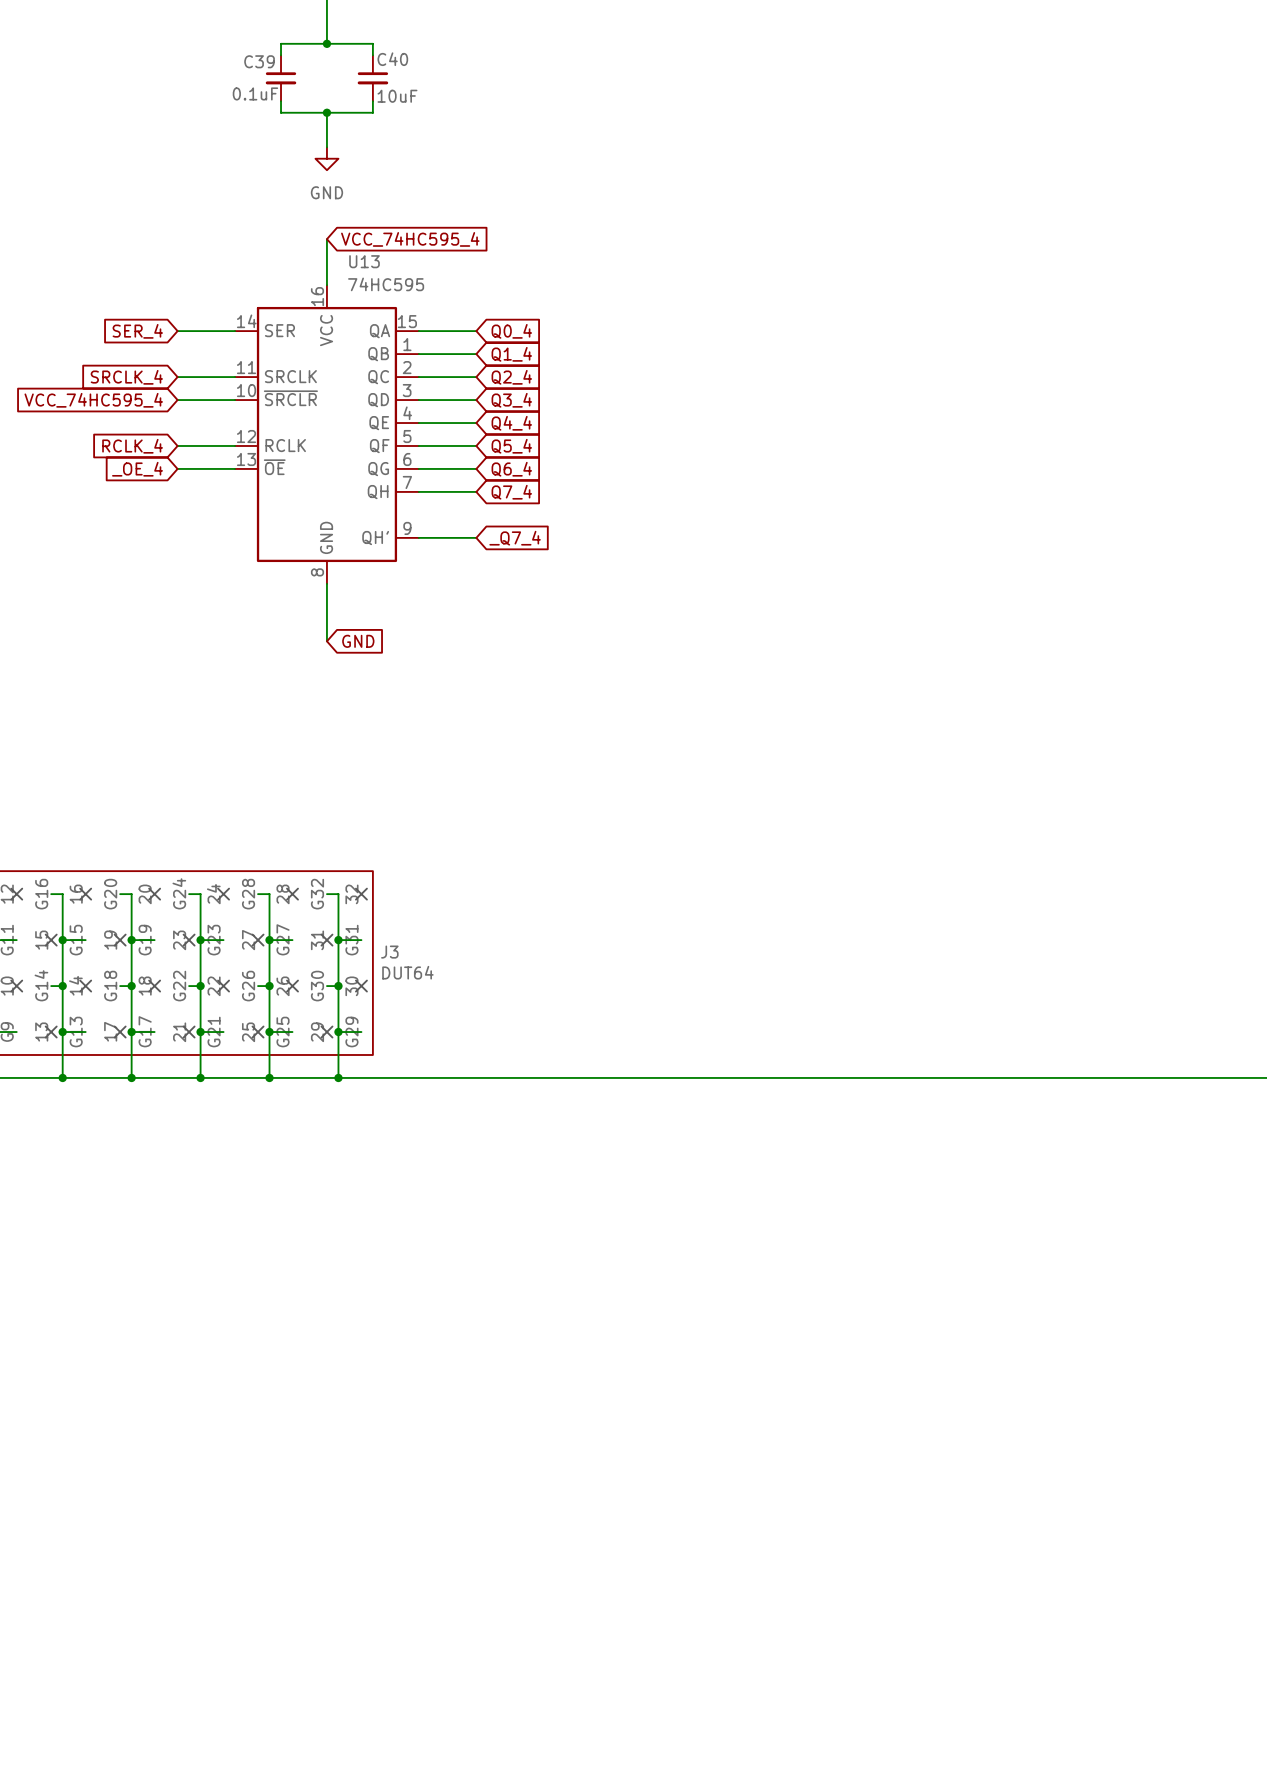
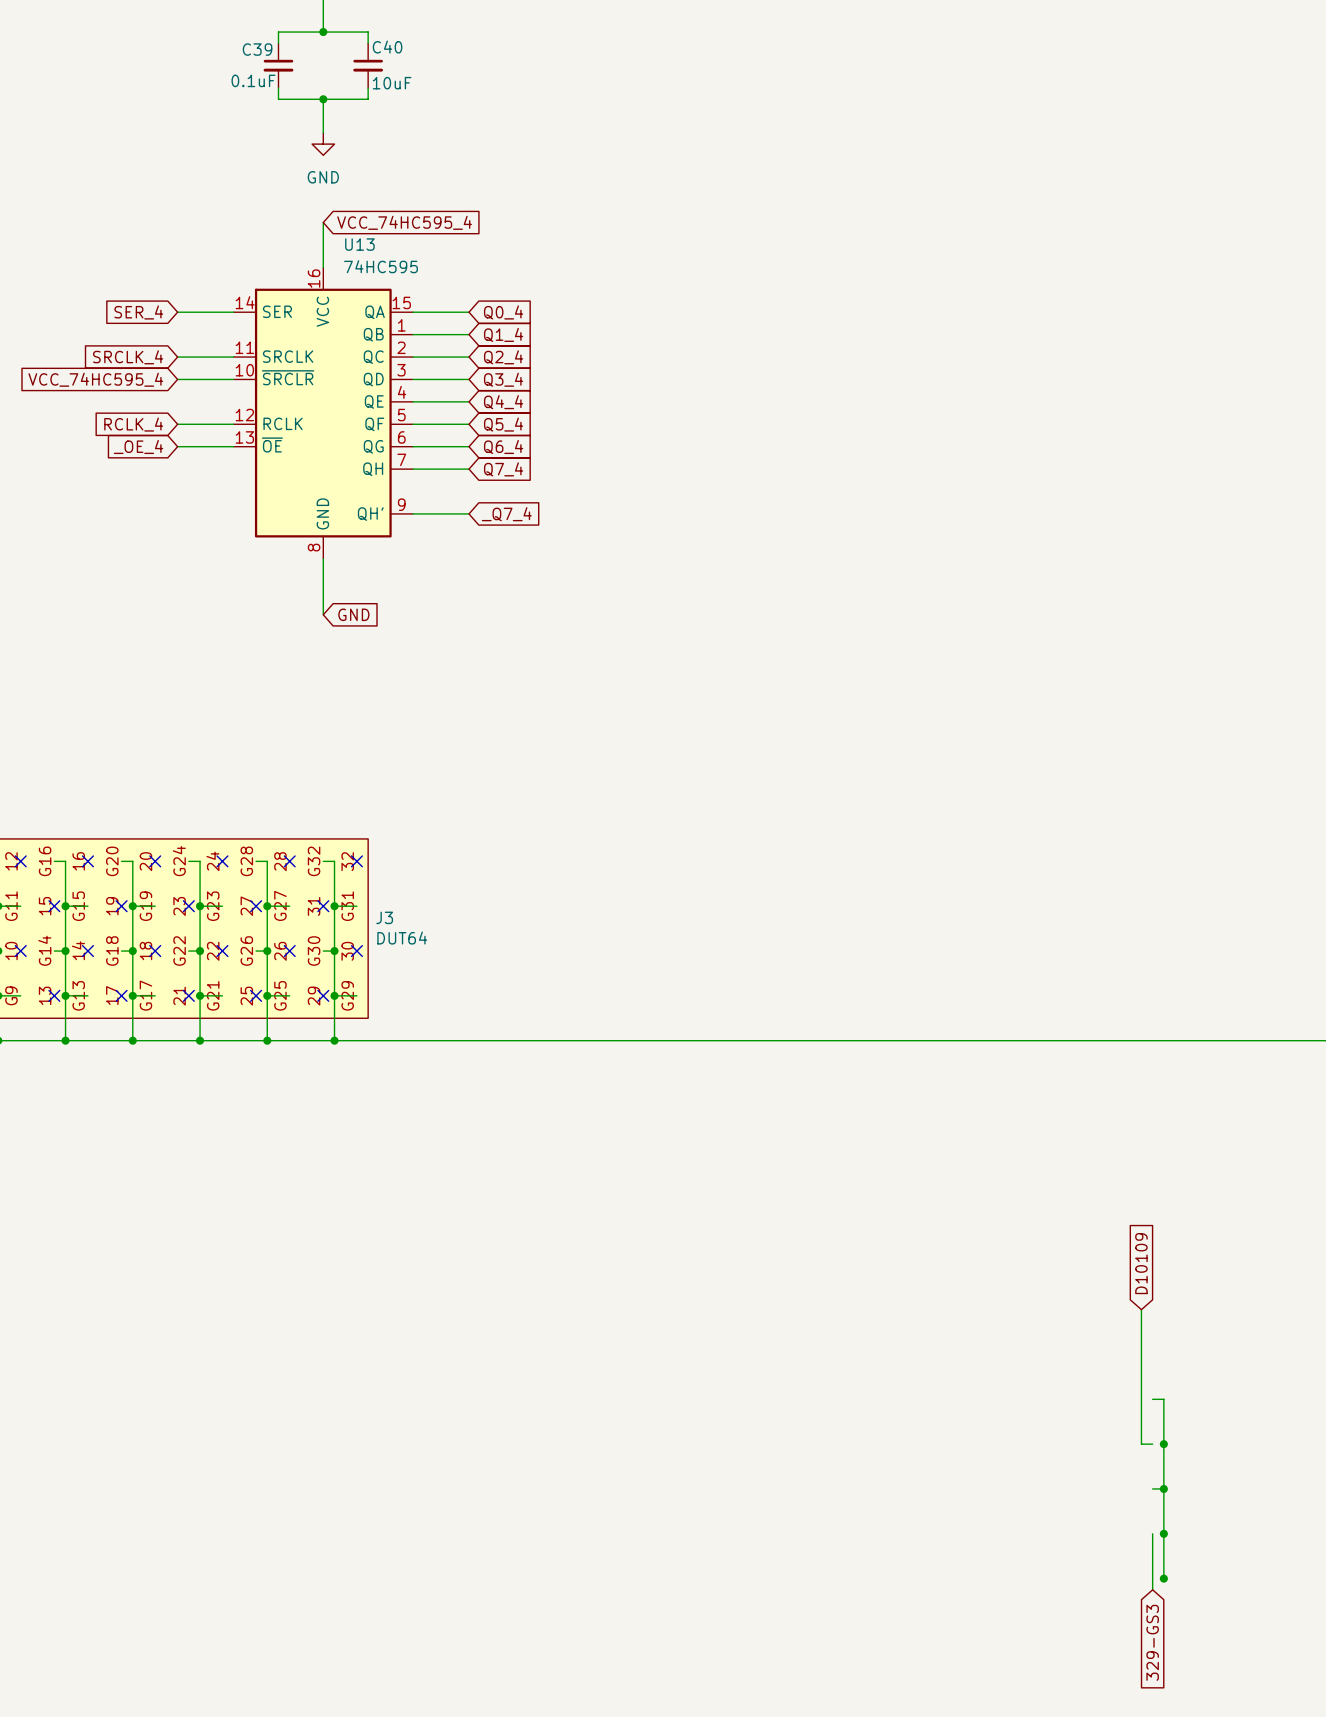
global label: none -> D10109 (1141, 1263)
wire: none -> (1141, 1309) (1141, 1444) (1152, 1444)
wire: none -> (1152, 1399) (1163, 1399) (1163, 1578)
junction: none -> (1163, 1444)
wire: none -> (1152, 1488) (1163, 1488)
junction: none -> (1163, 1488)
wire: none -> (1152, 1533) (1152, 1589)
junction: none -> (1163, 1533)
junction: none -> (1163, 1578)
global label: none -> 329-GS3 (1152, 1642)

